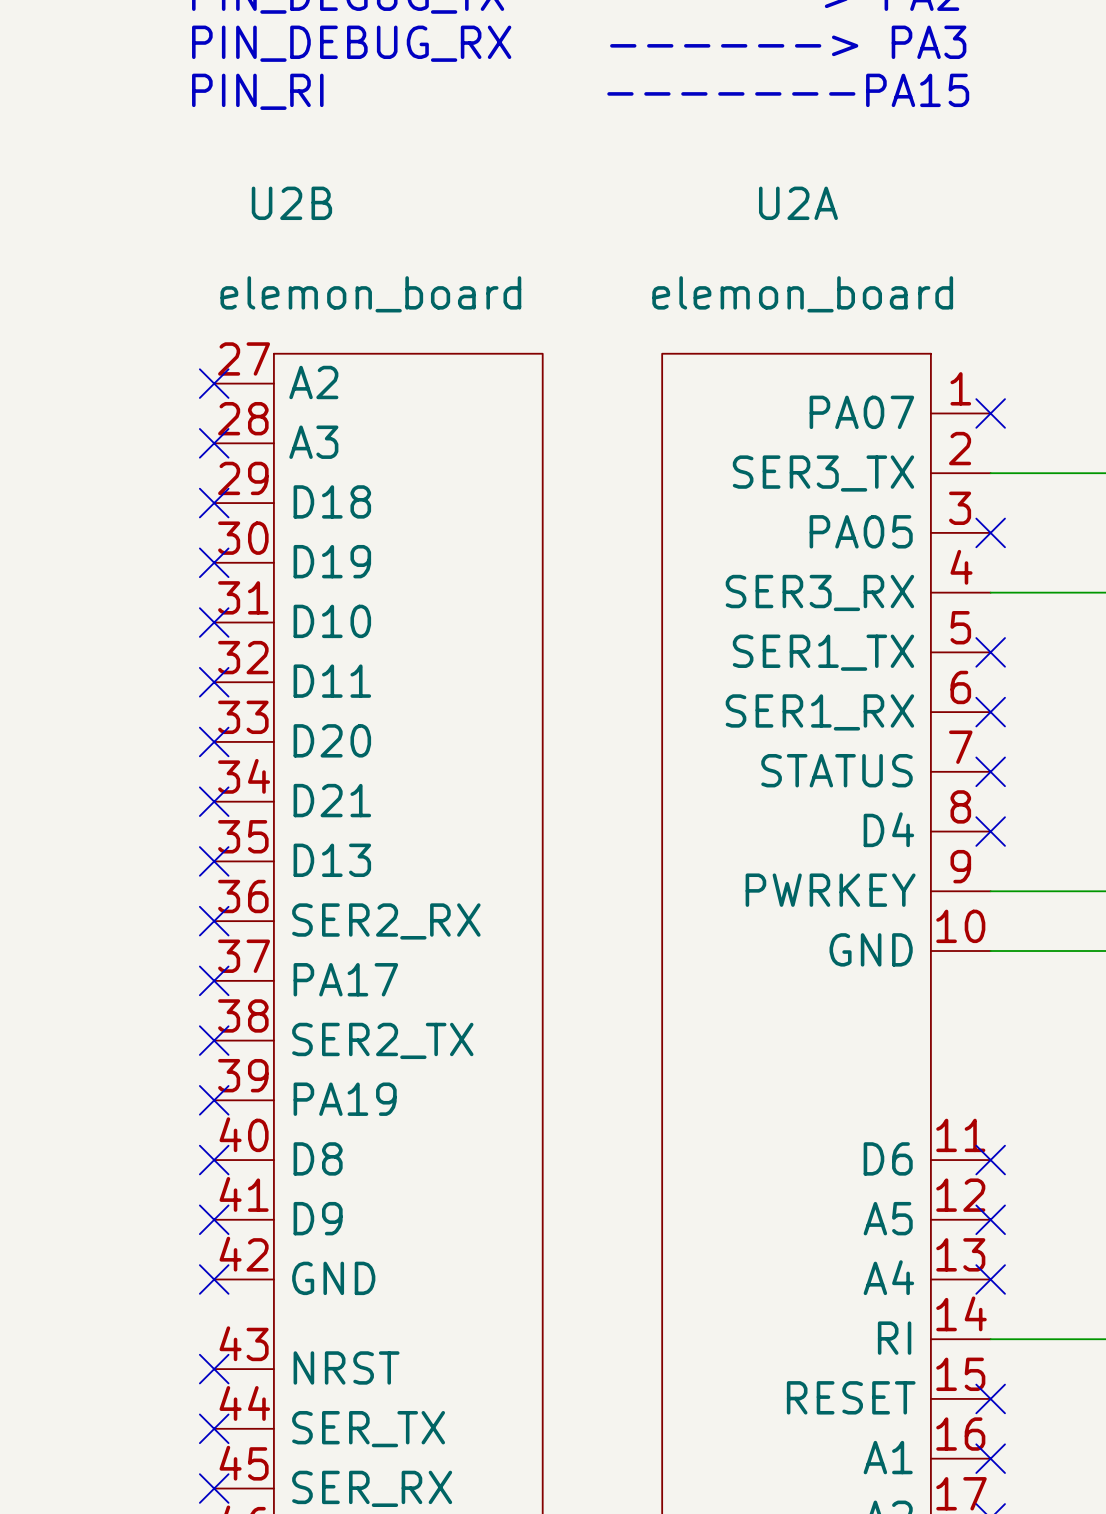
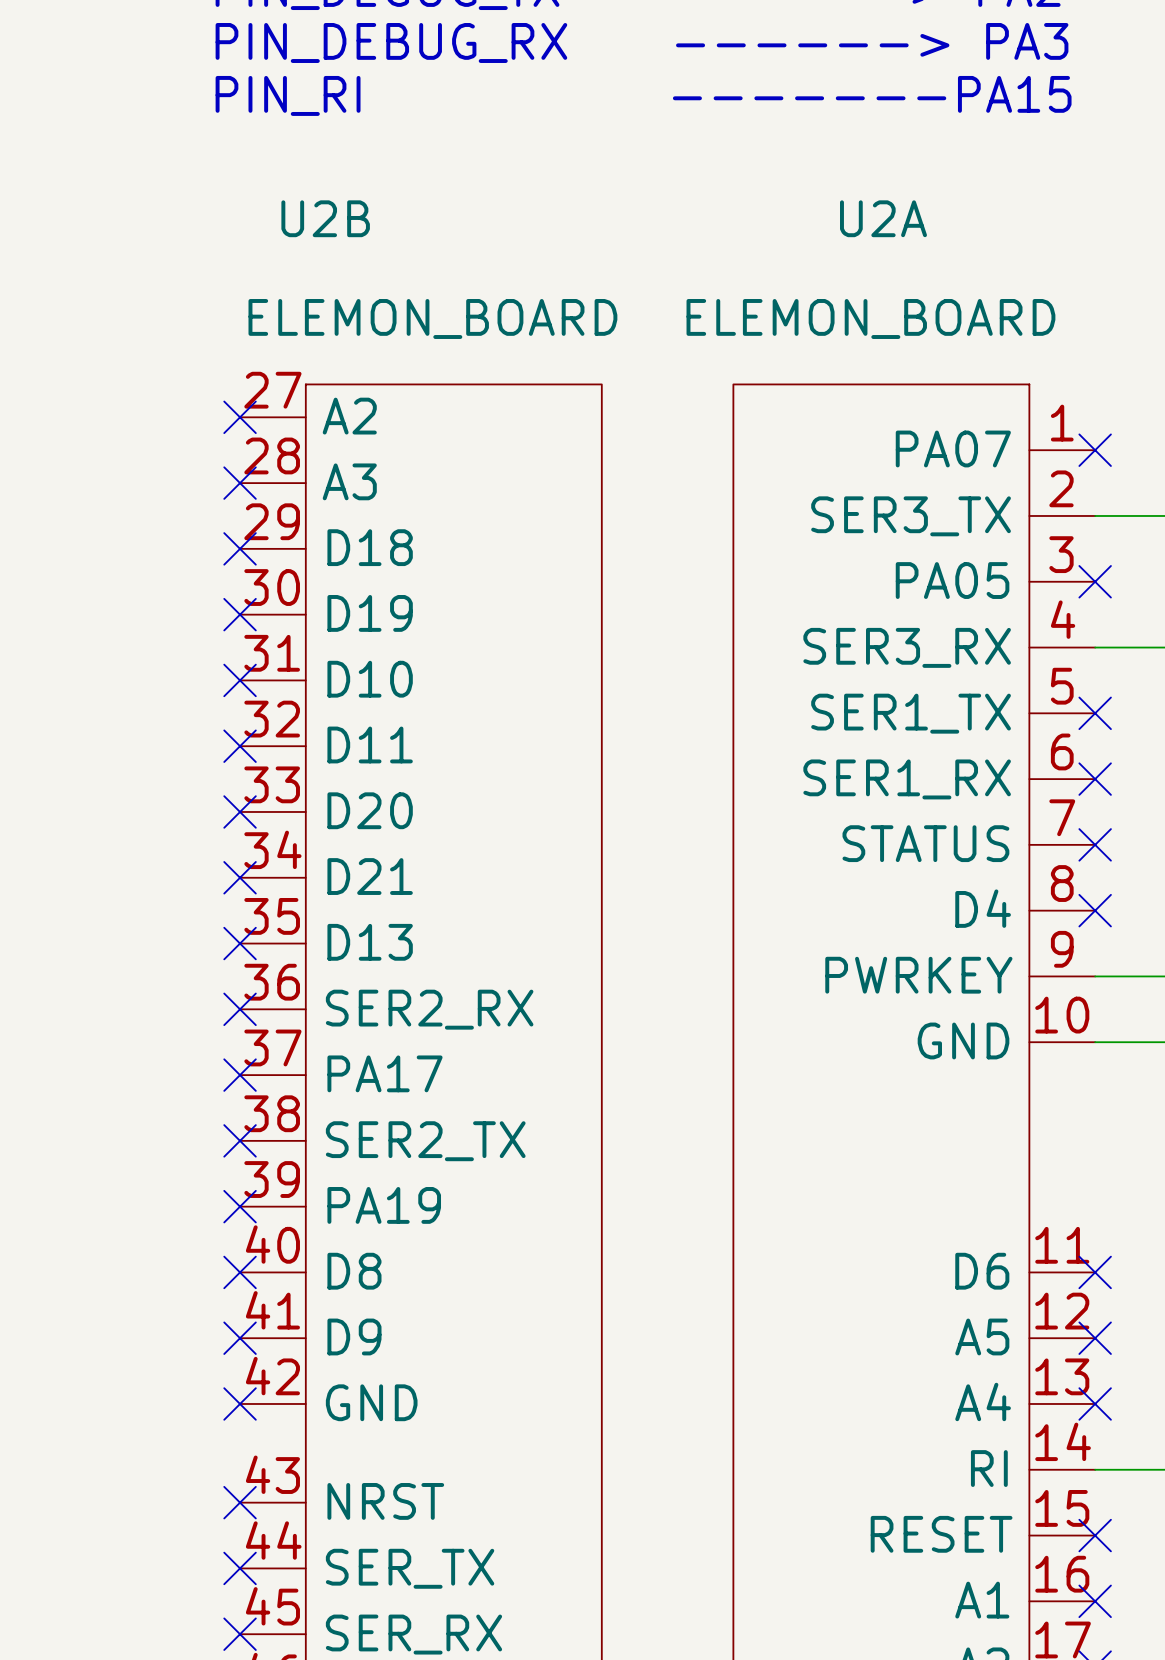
U2B value: elemon_board (370, 294) -> ELEMON_BOARD (432, 318)
U2A value: elemon_board (802, 294) -> ELEMON_BOARD (870, 318)

